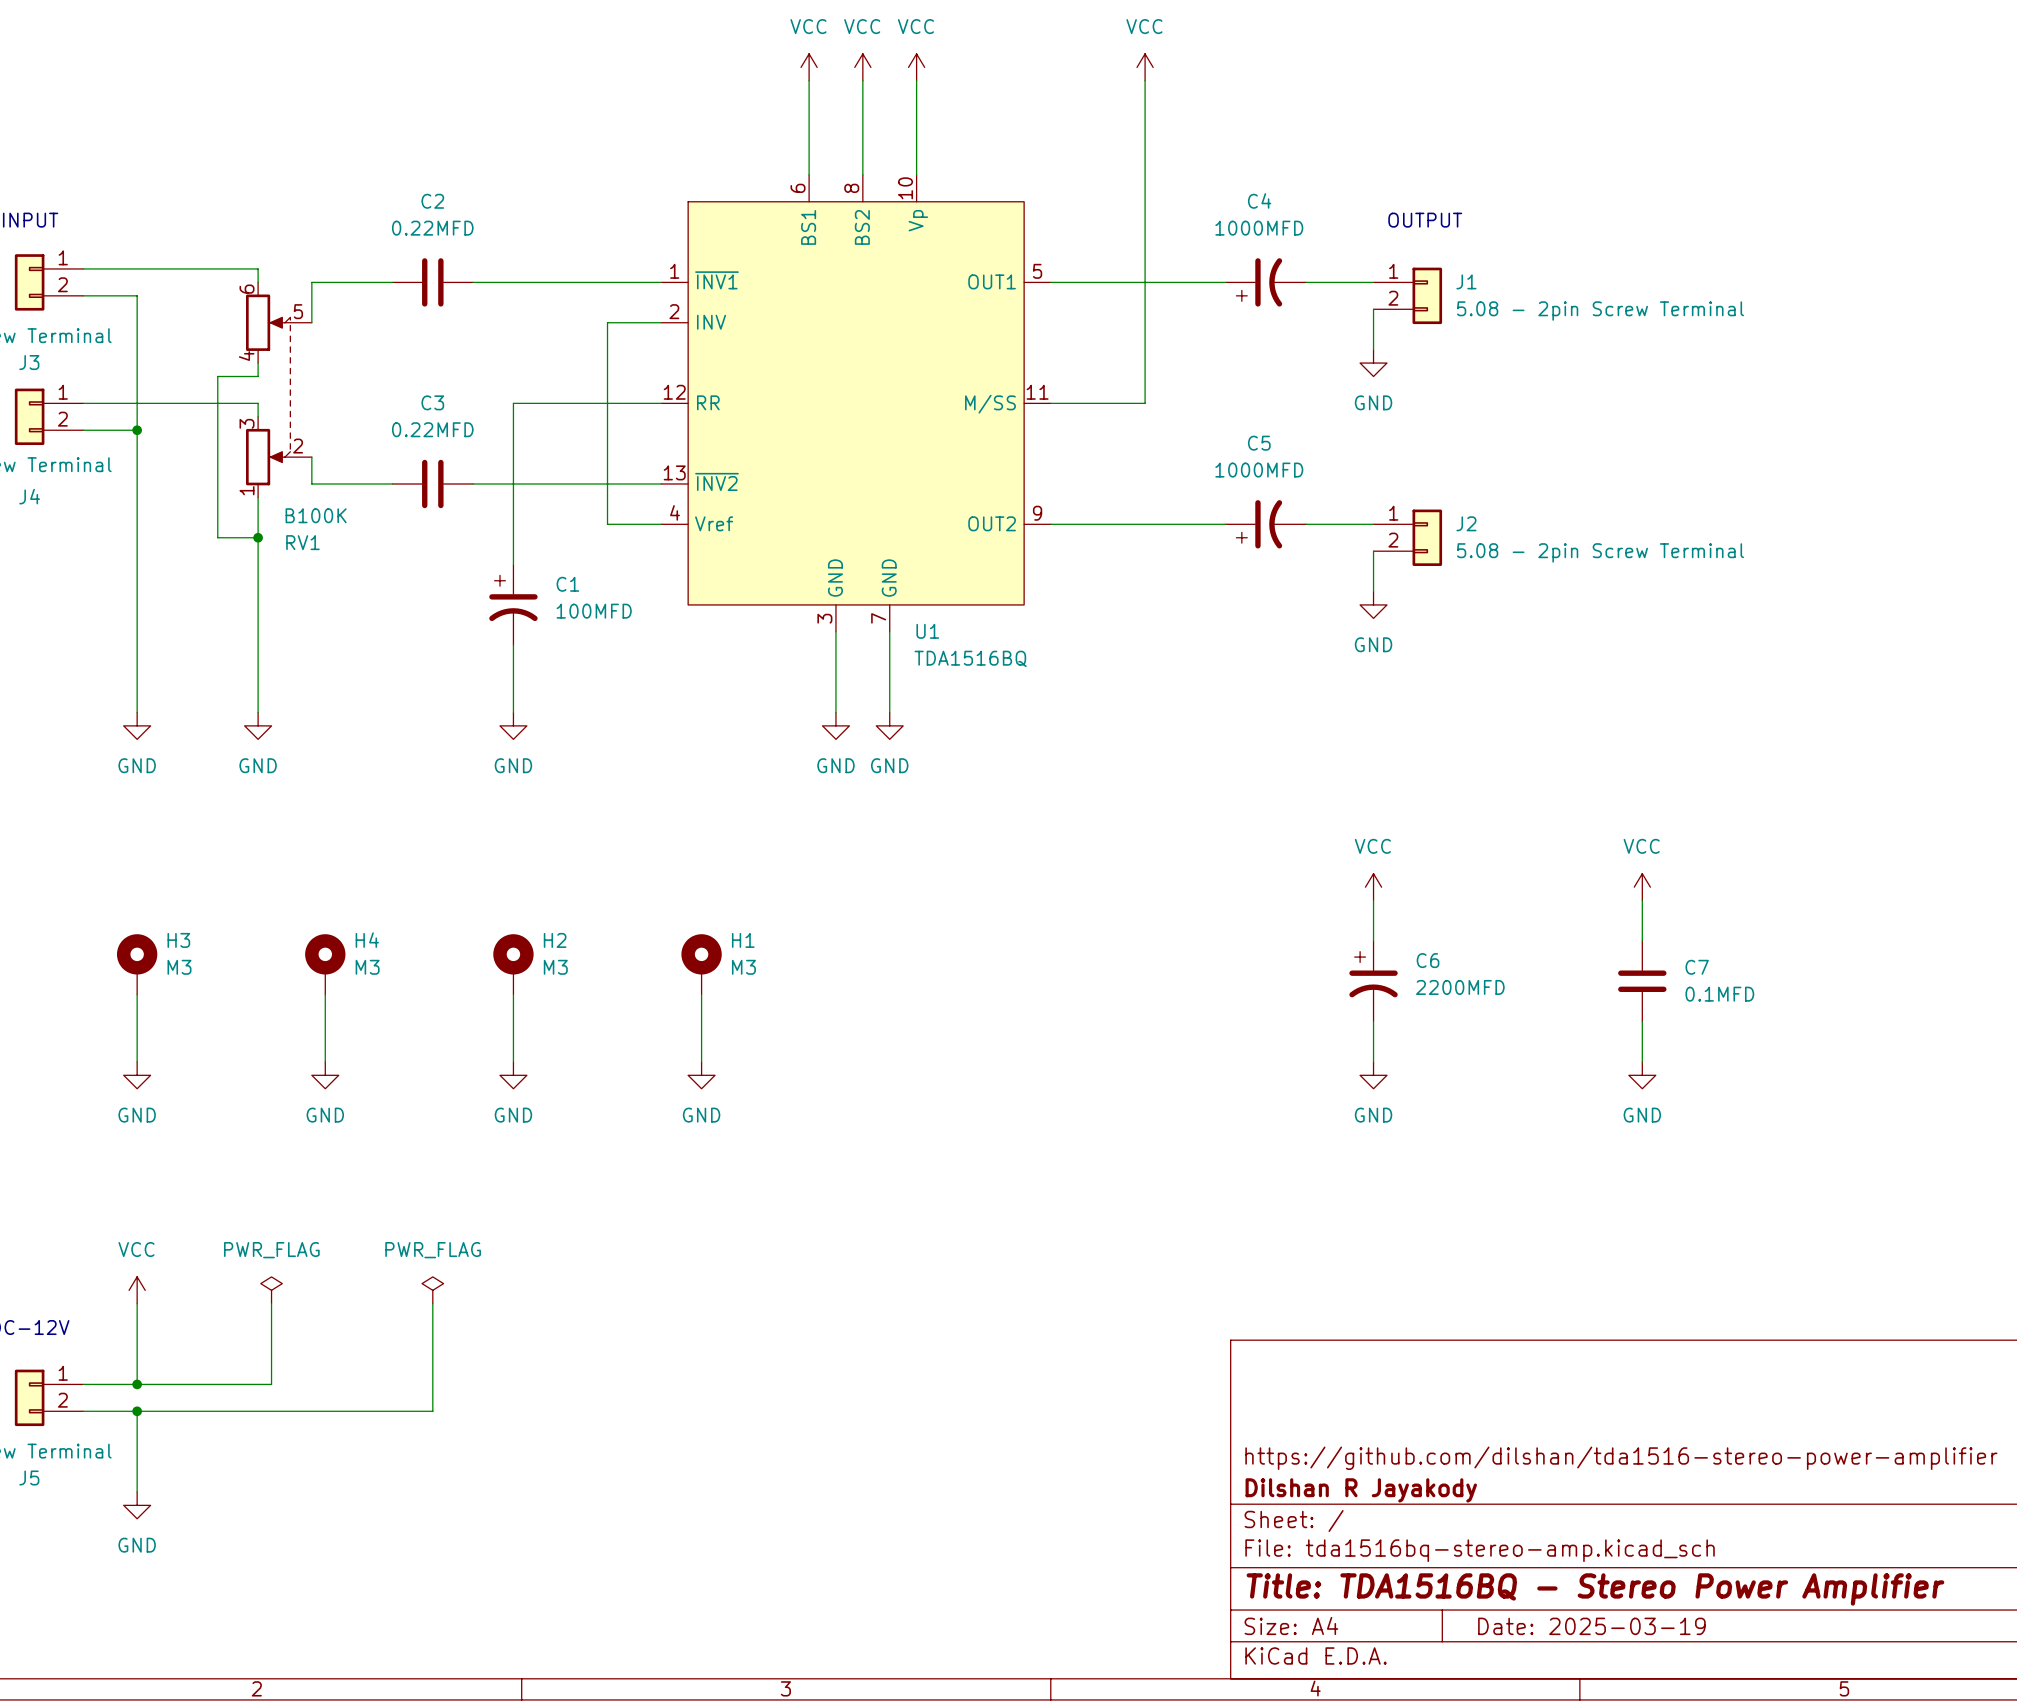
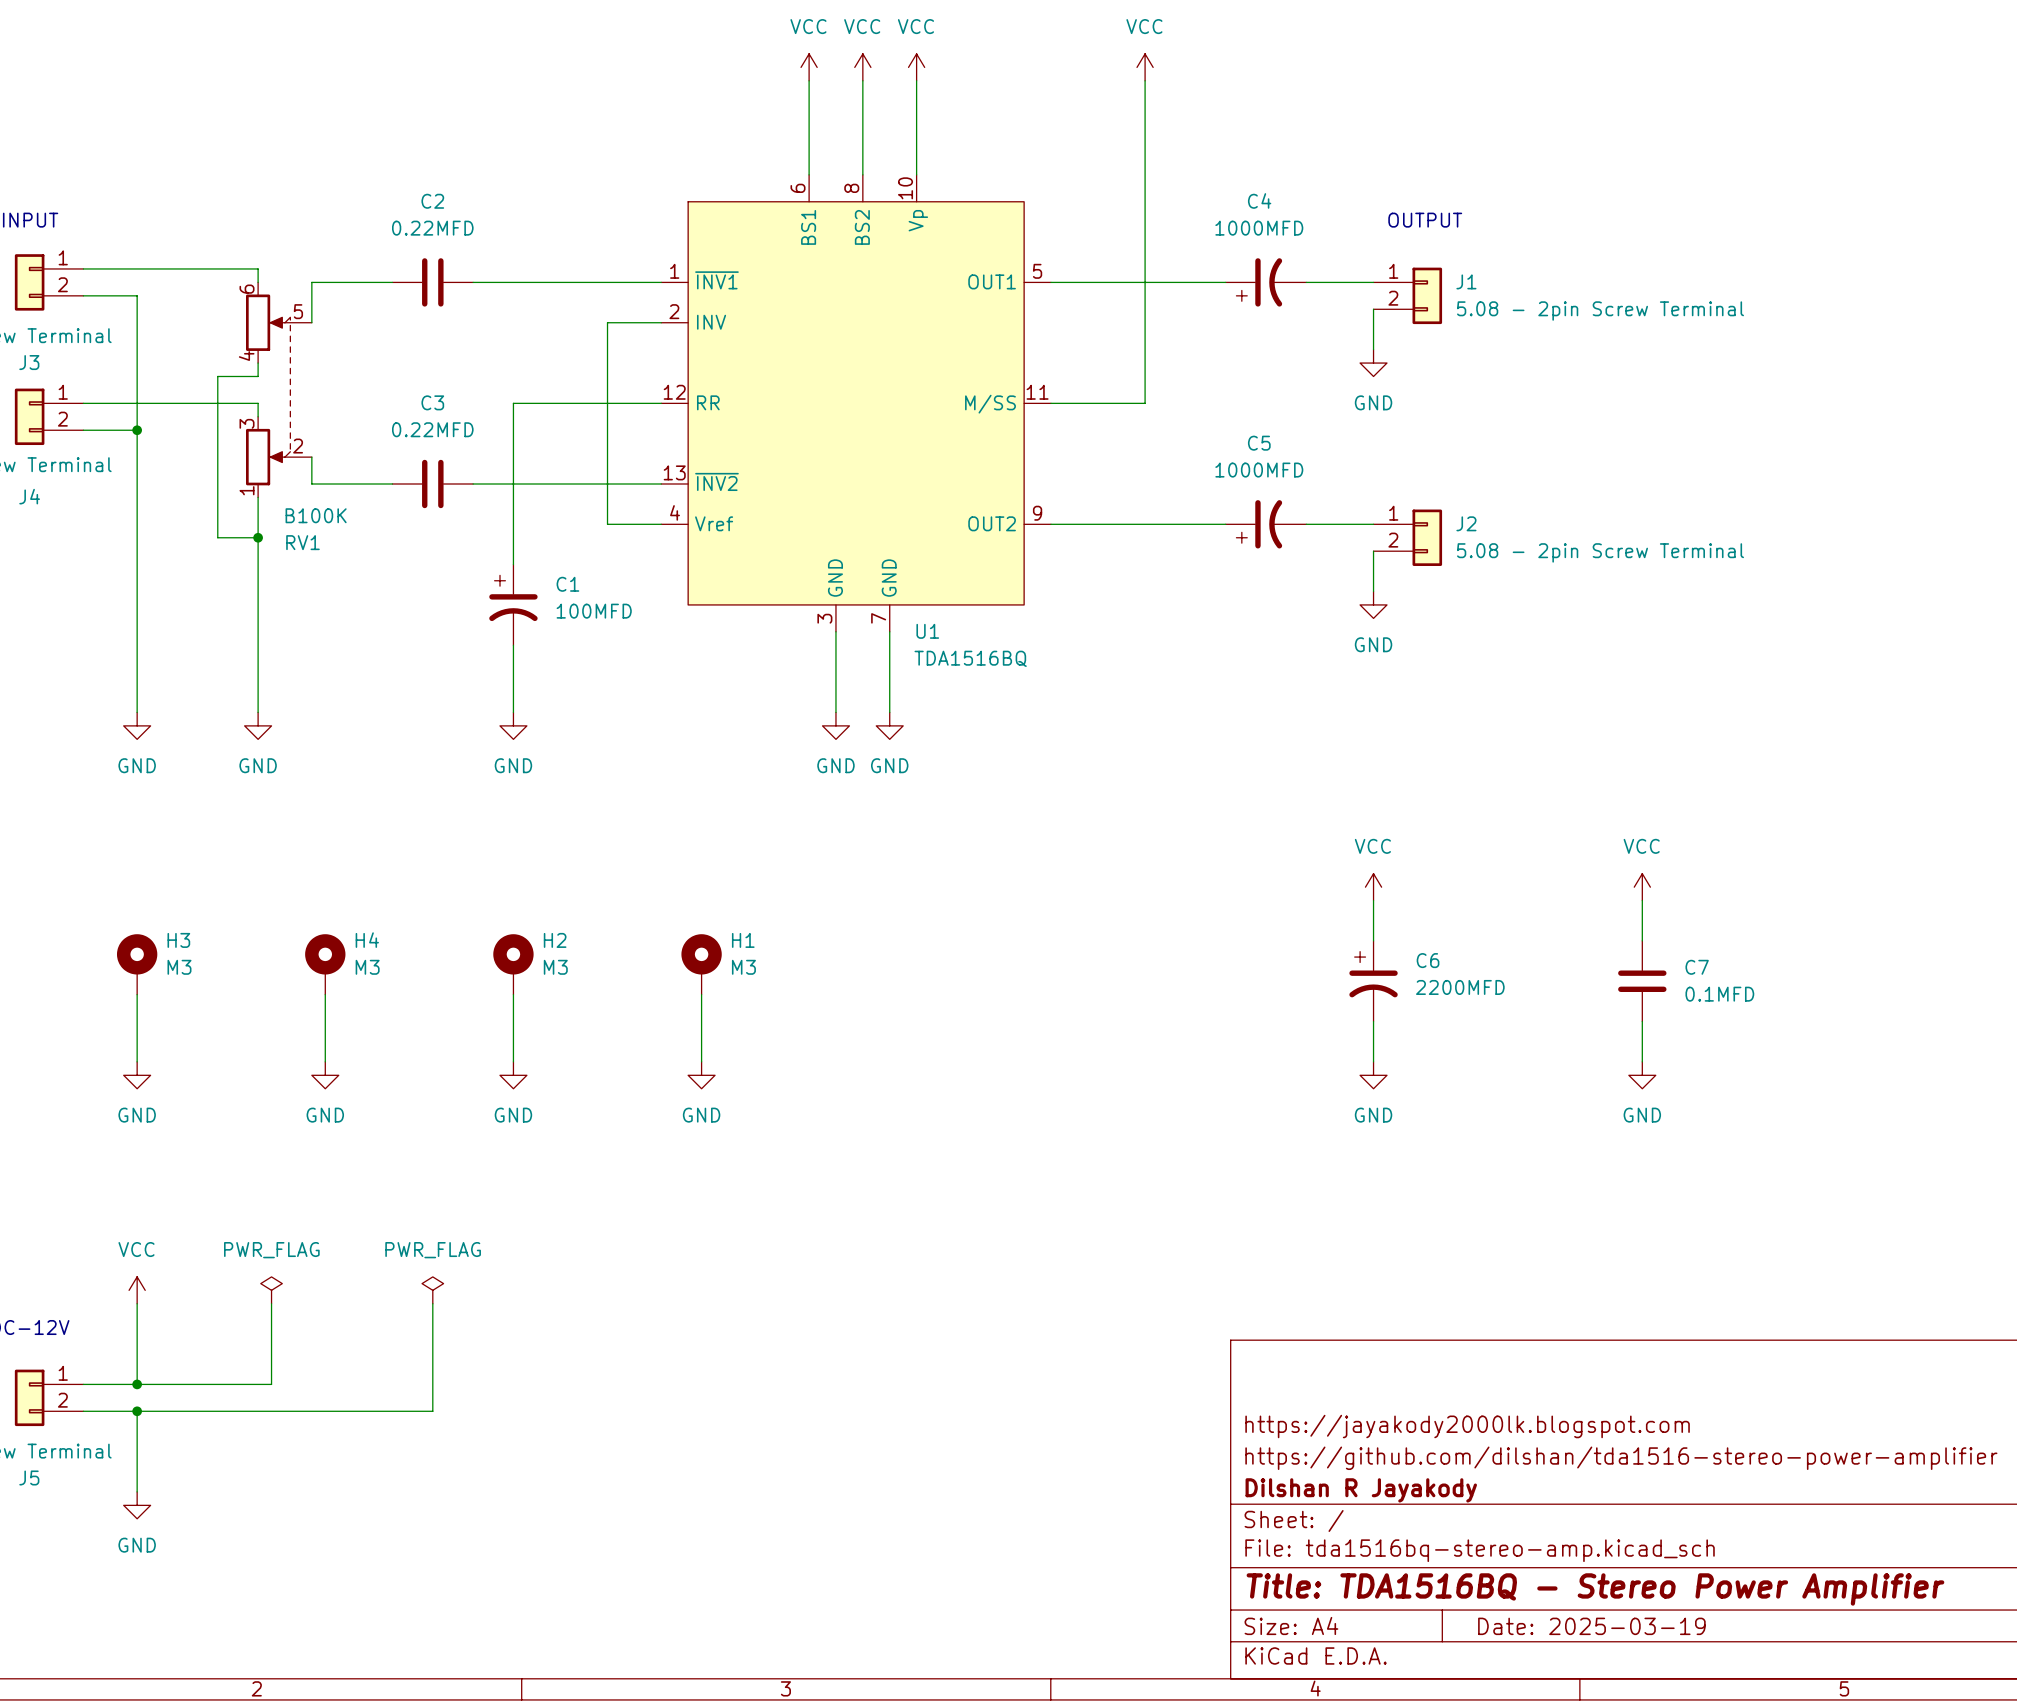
title block: none -> https://jayakody2000lk.blogspot.com (1467, 1426)

